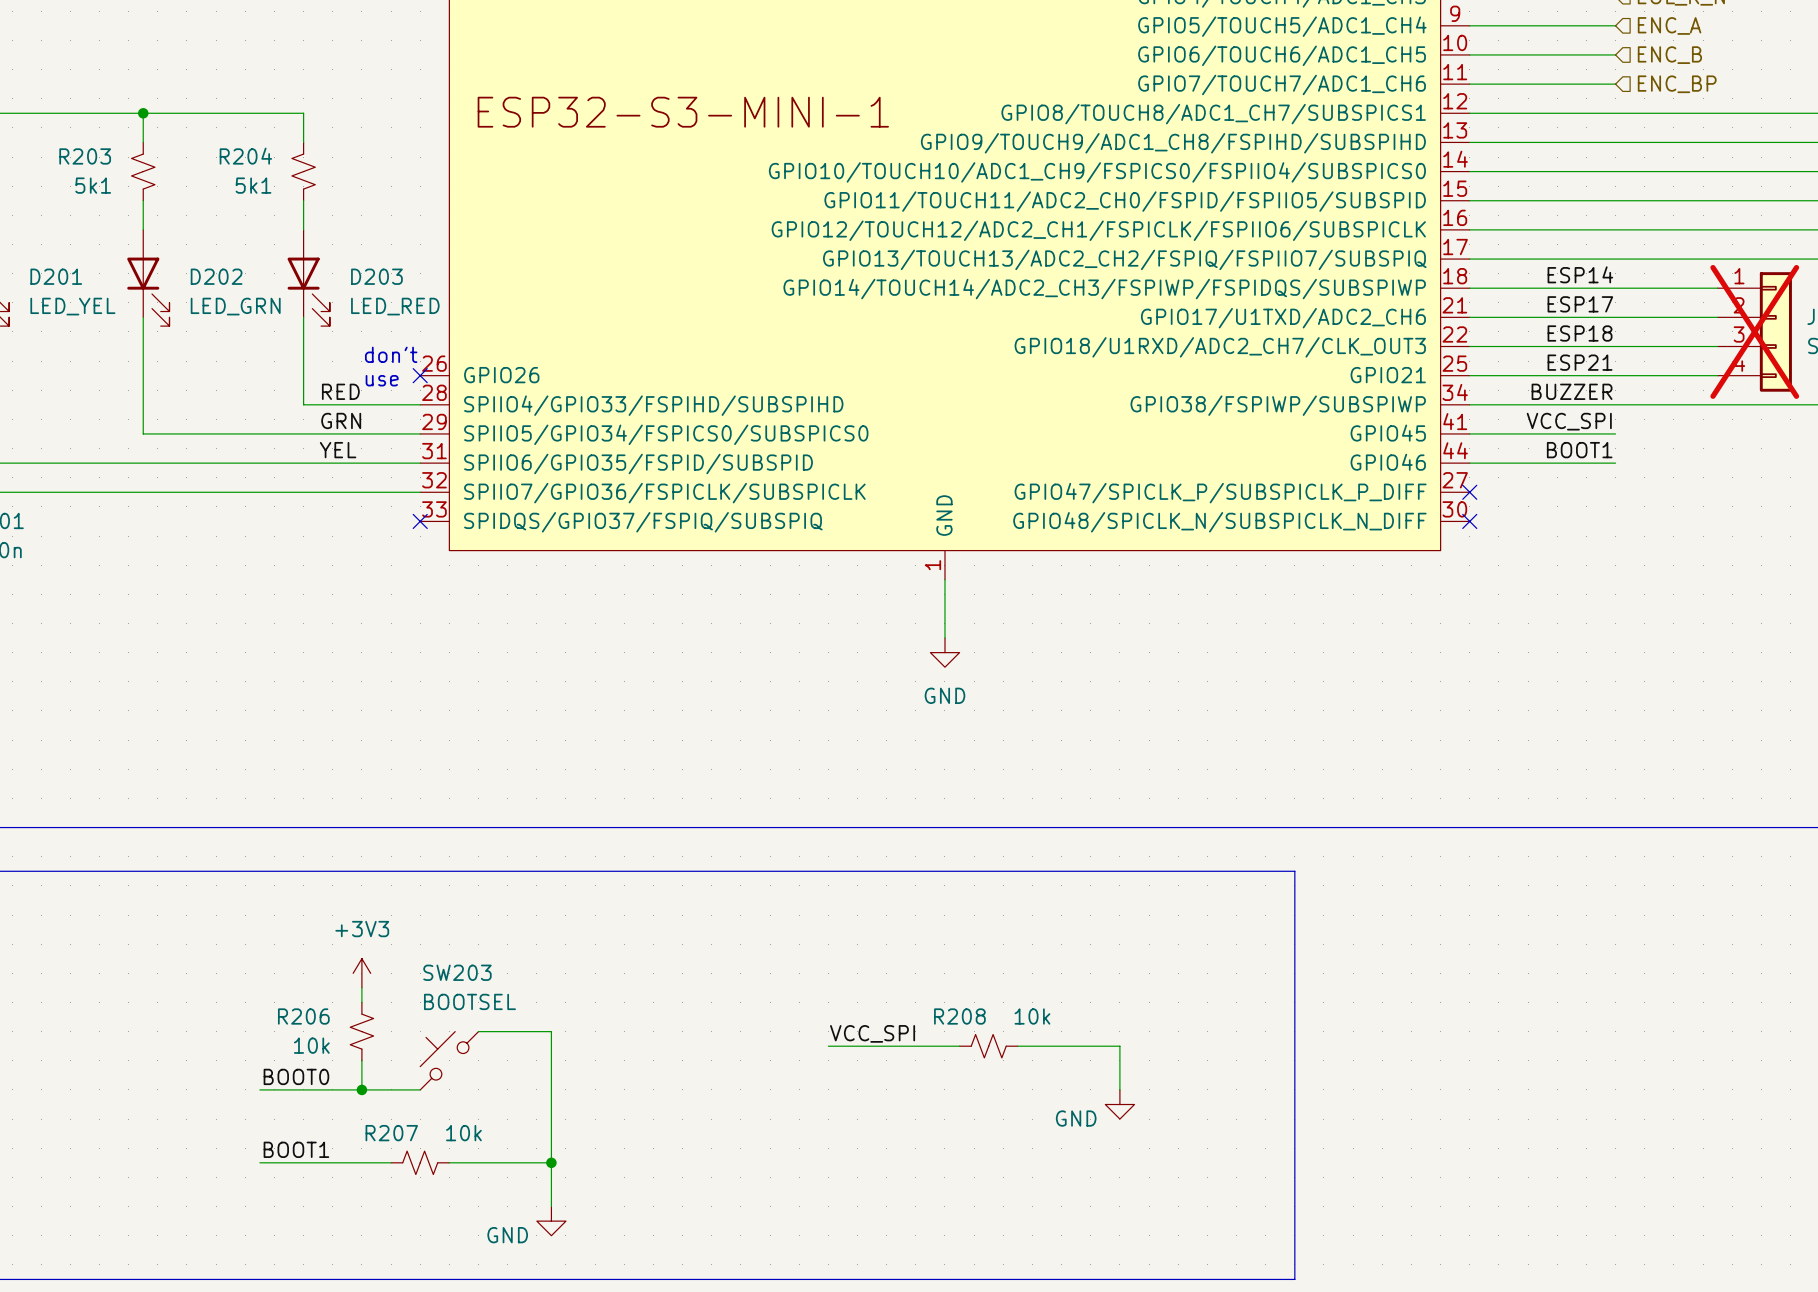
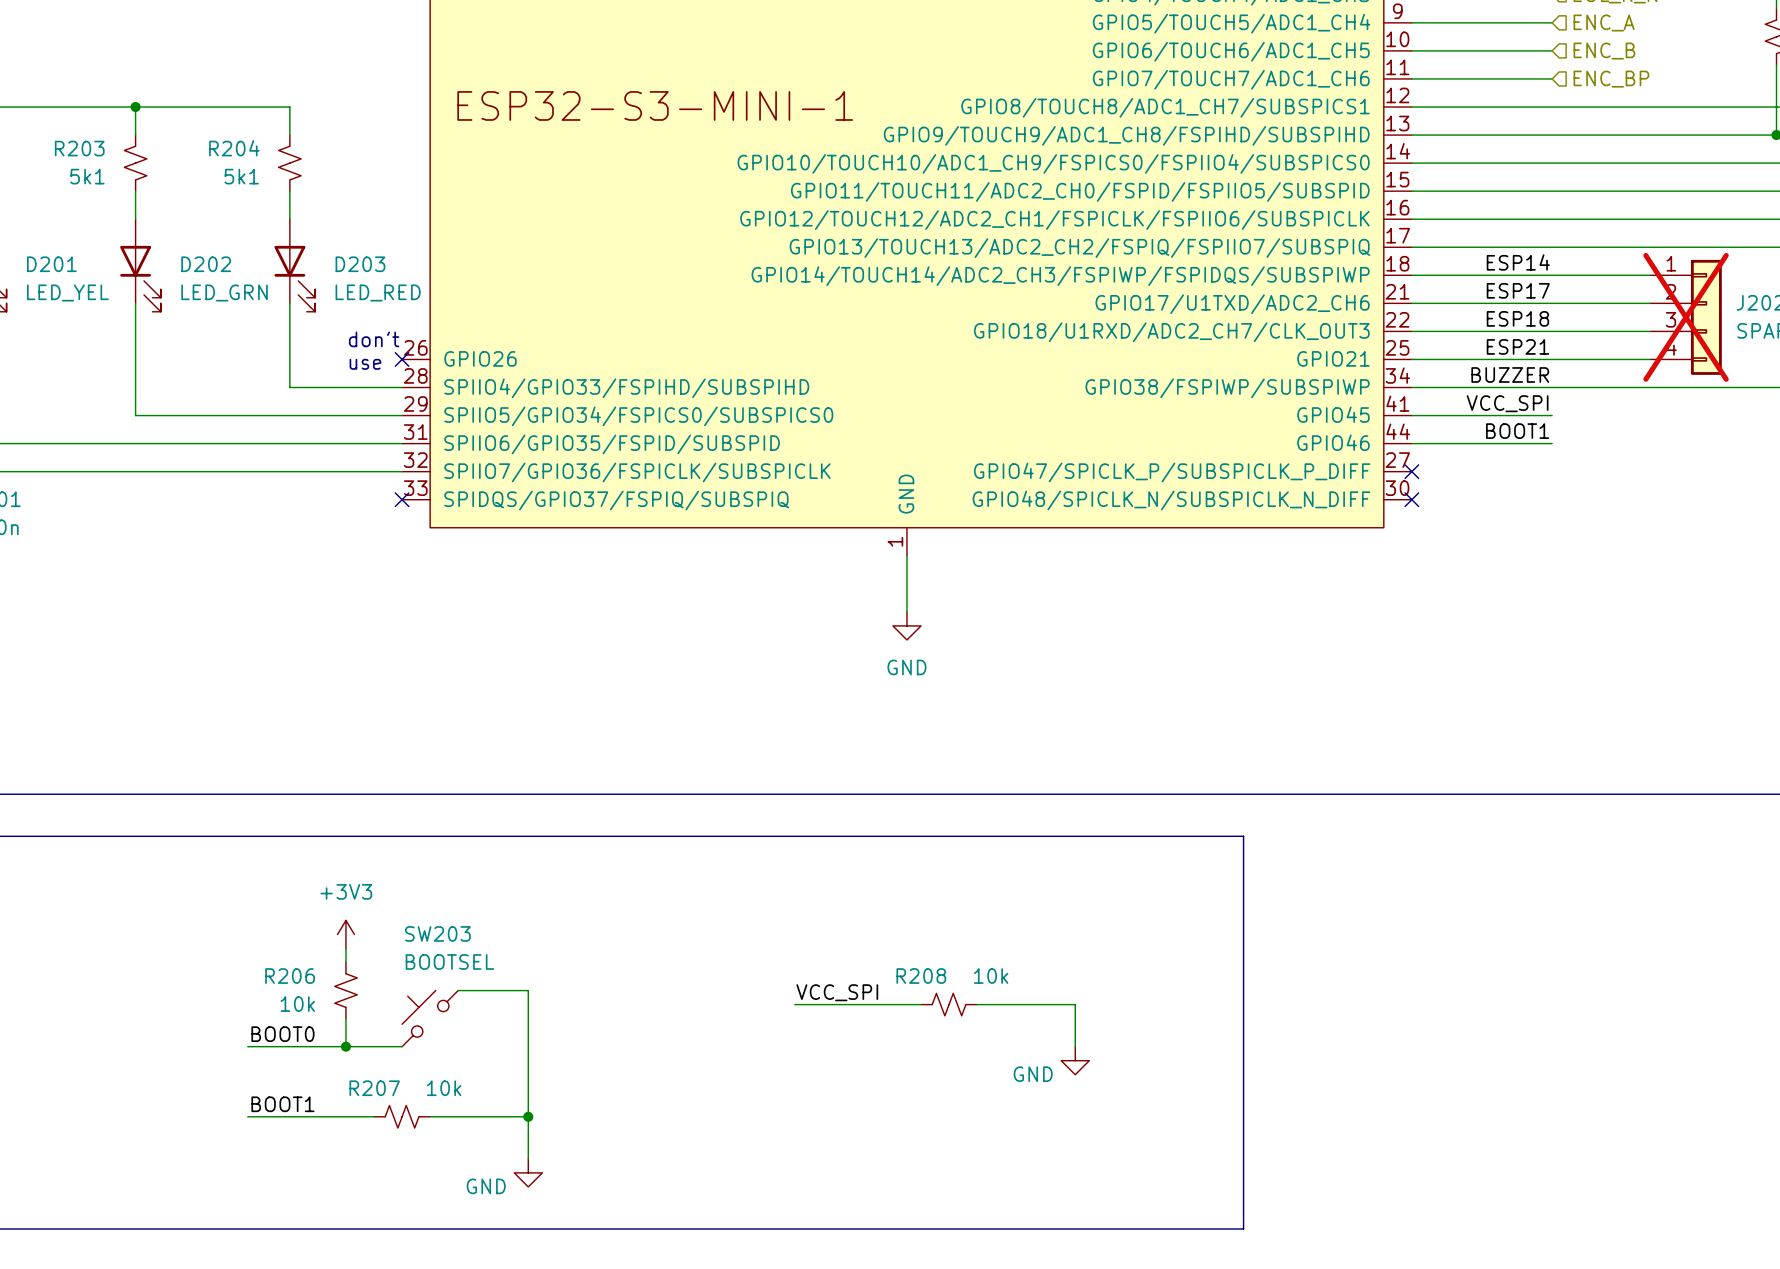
label: RED (340, 391) -> none
label: GRN (341, 420) -> none
label: YEL (338, 450) -> none

